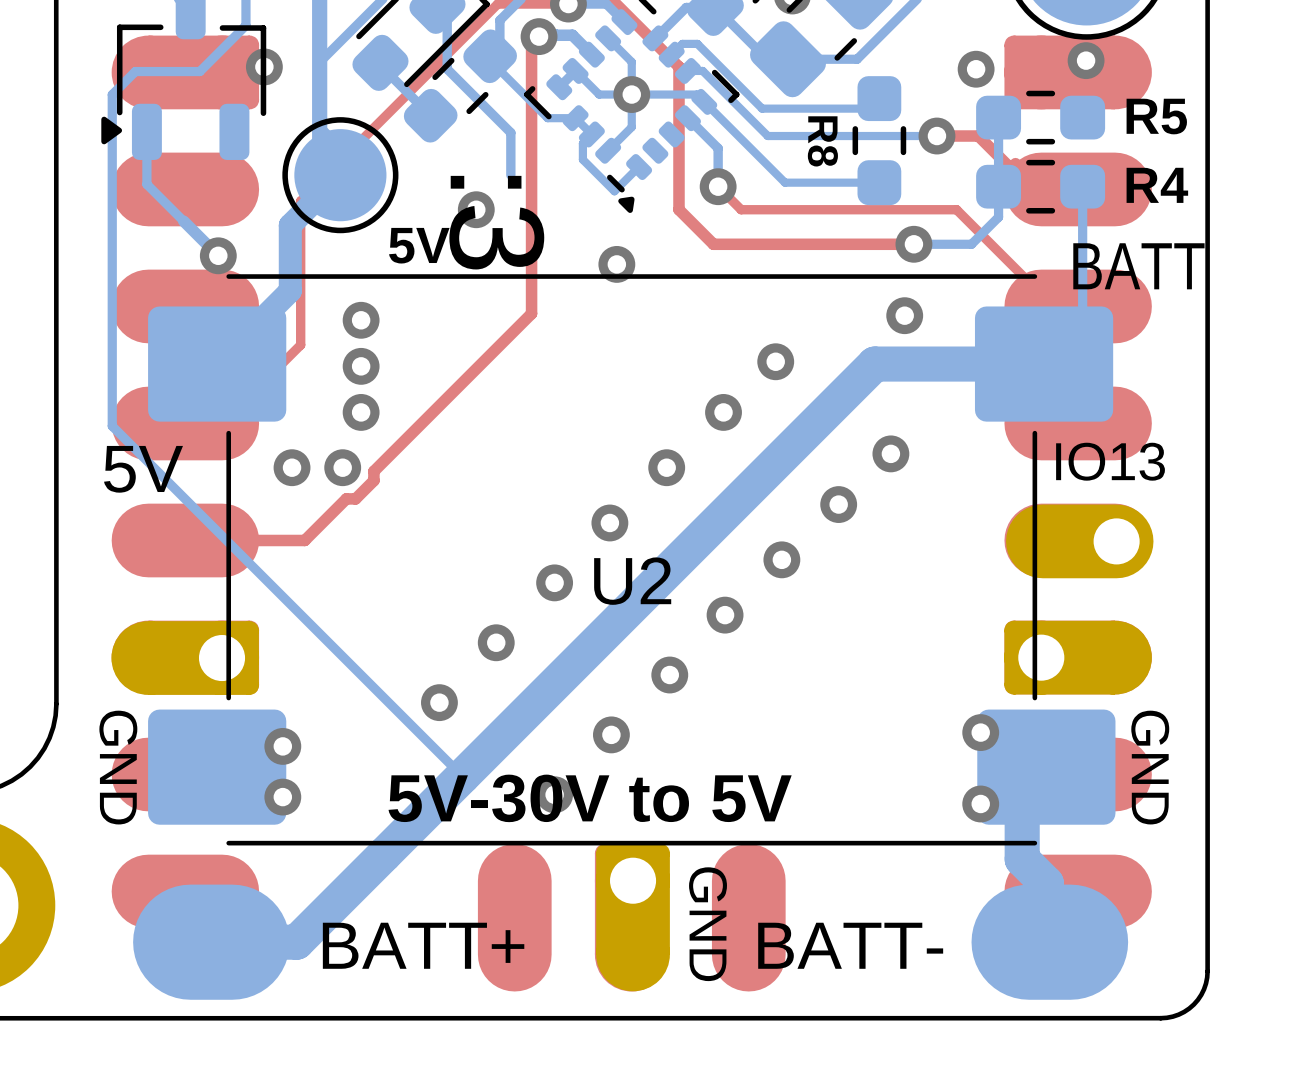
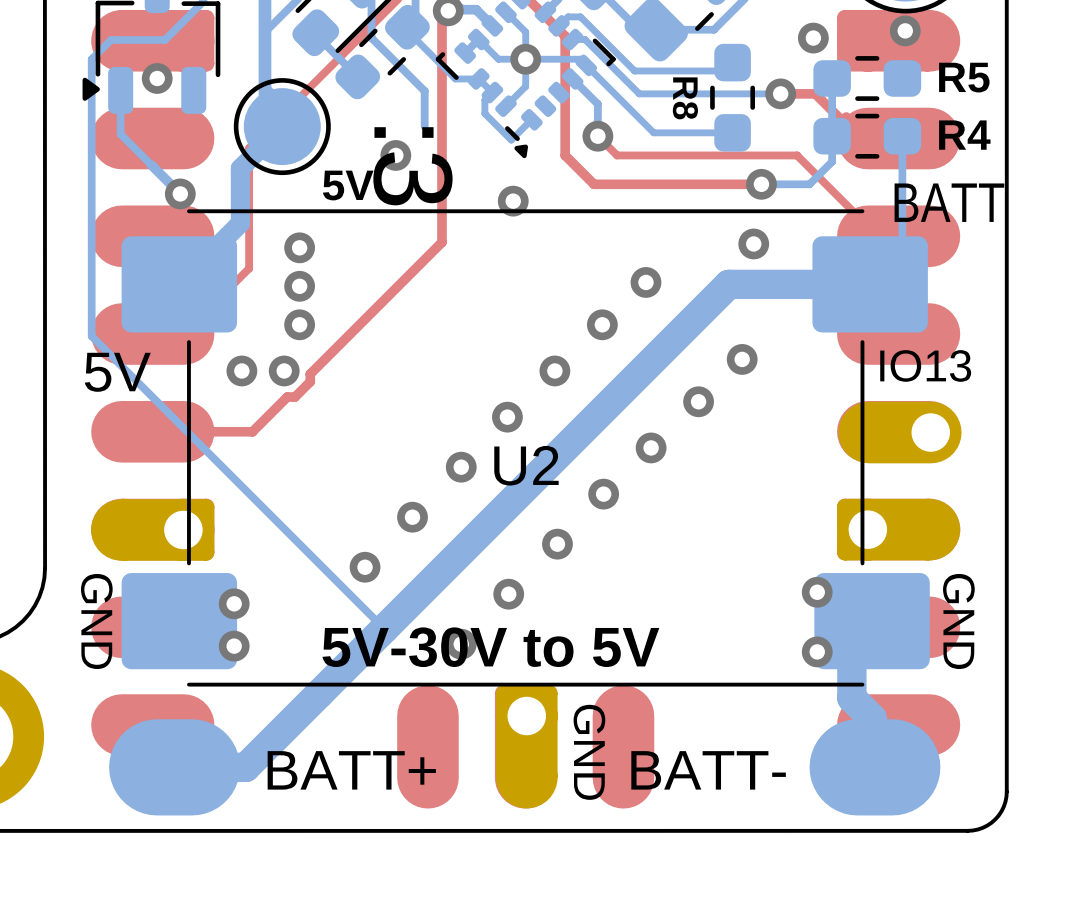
via position: (264, 66) -> (157, 78)

